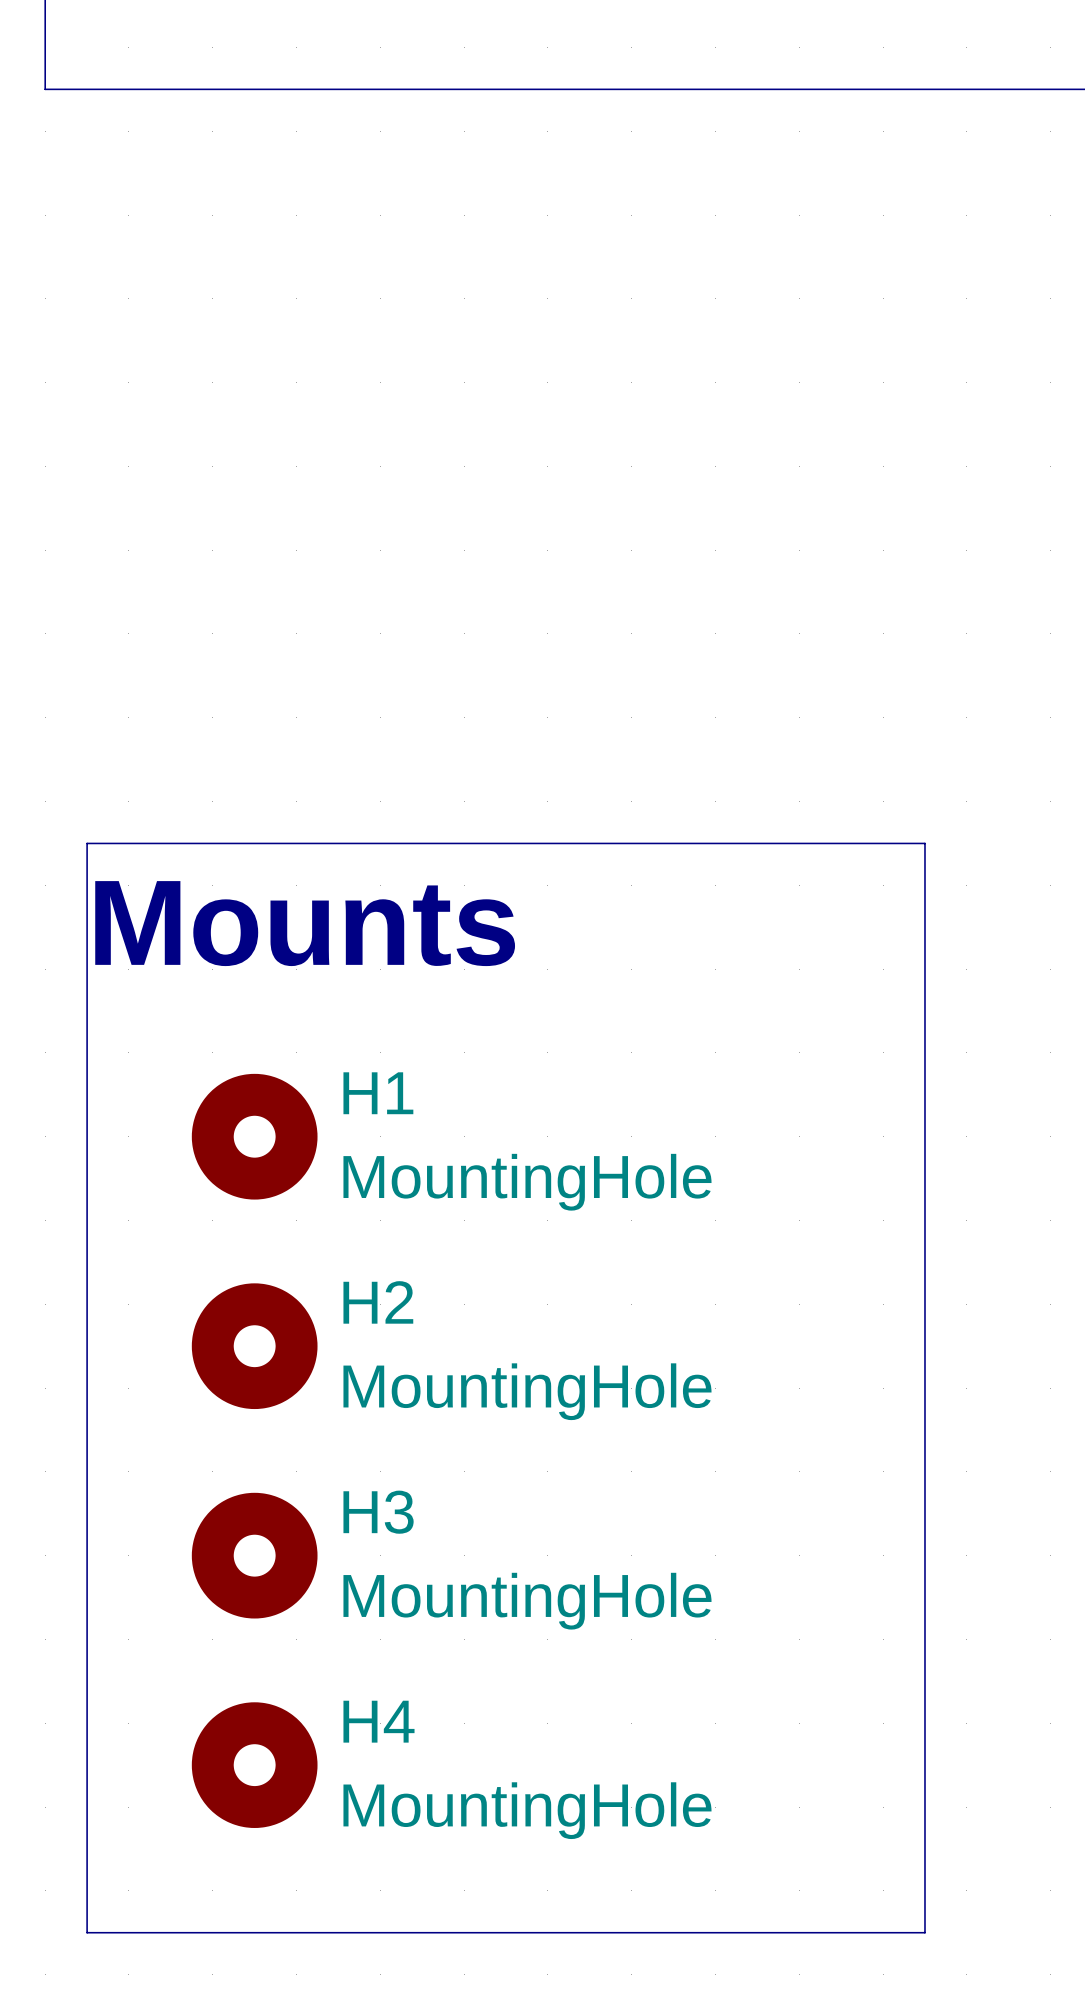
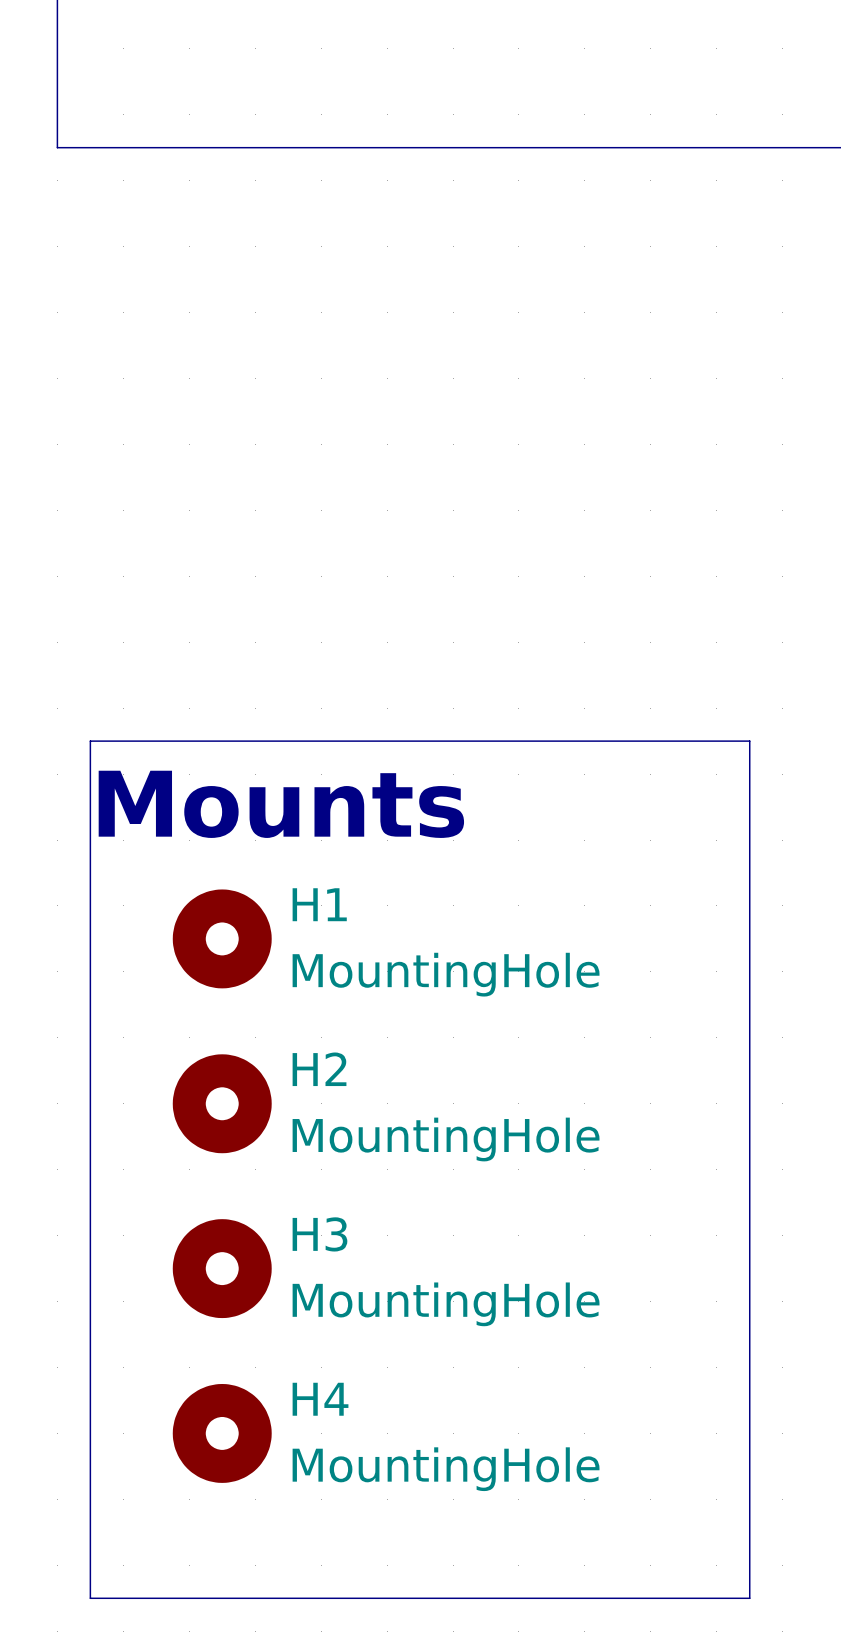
H1 position: (254, 1136) -> (222, 938)
H2 position: (254, 1346) -> (222, 1103)
H3 position: (254, 1555) -> (222, 1268)
H4 position: (254, 1765) -> (222, 1433)

